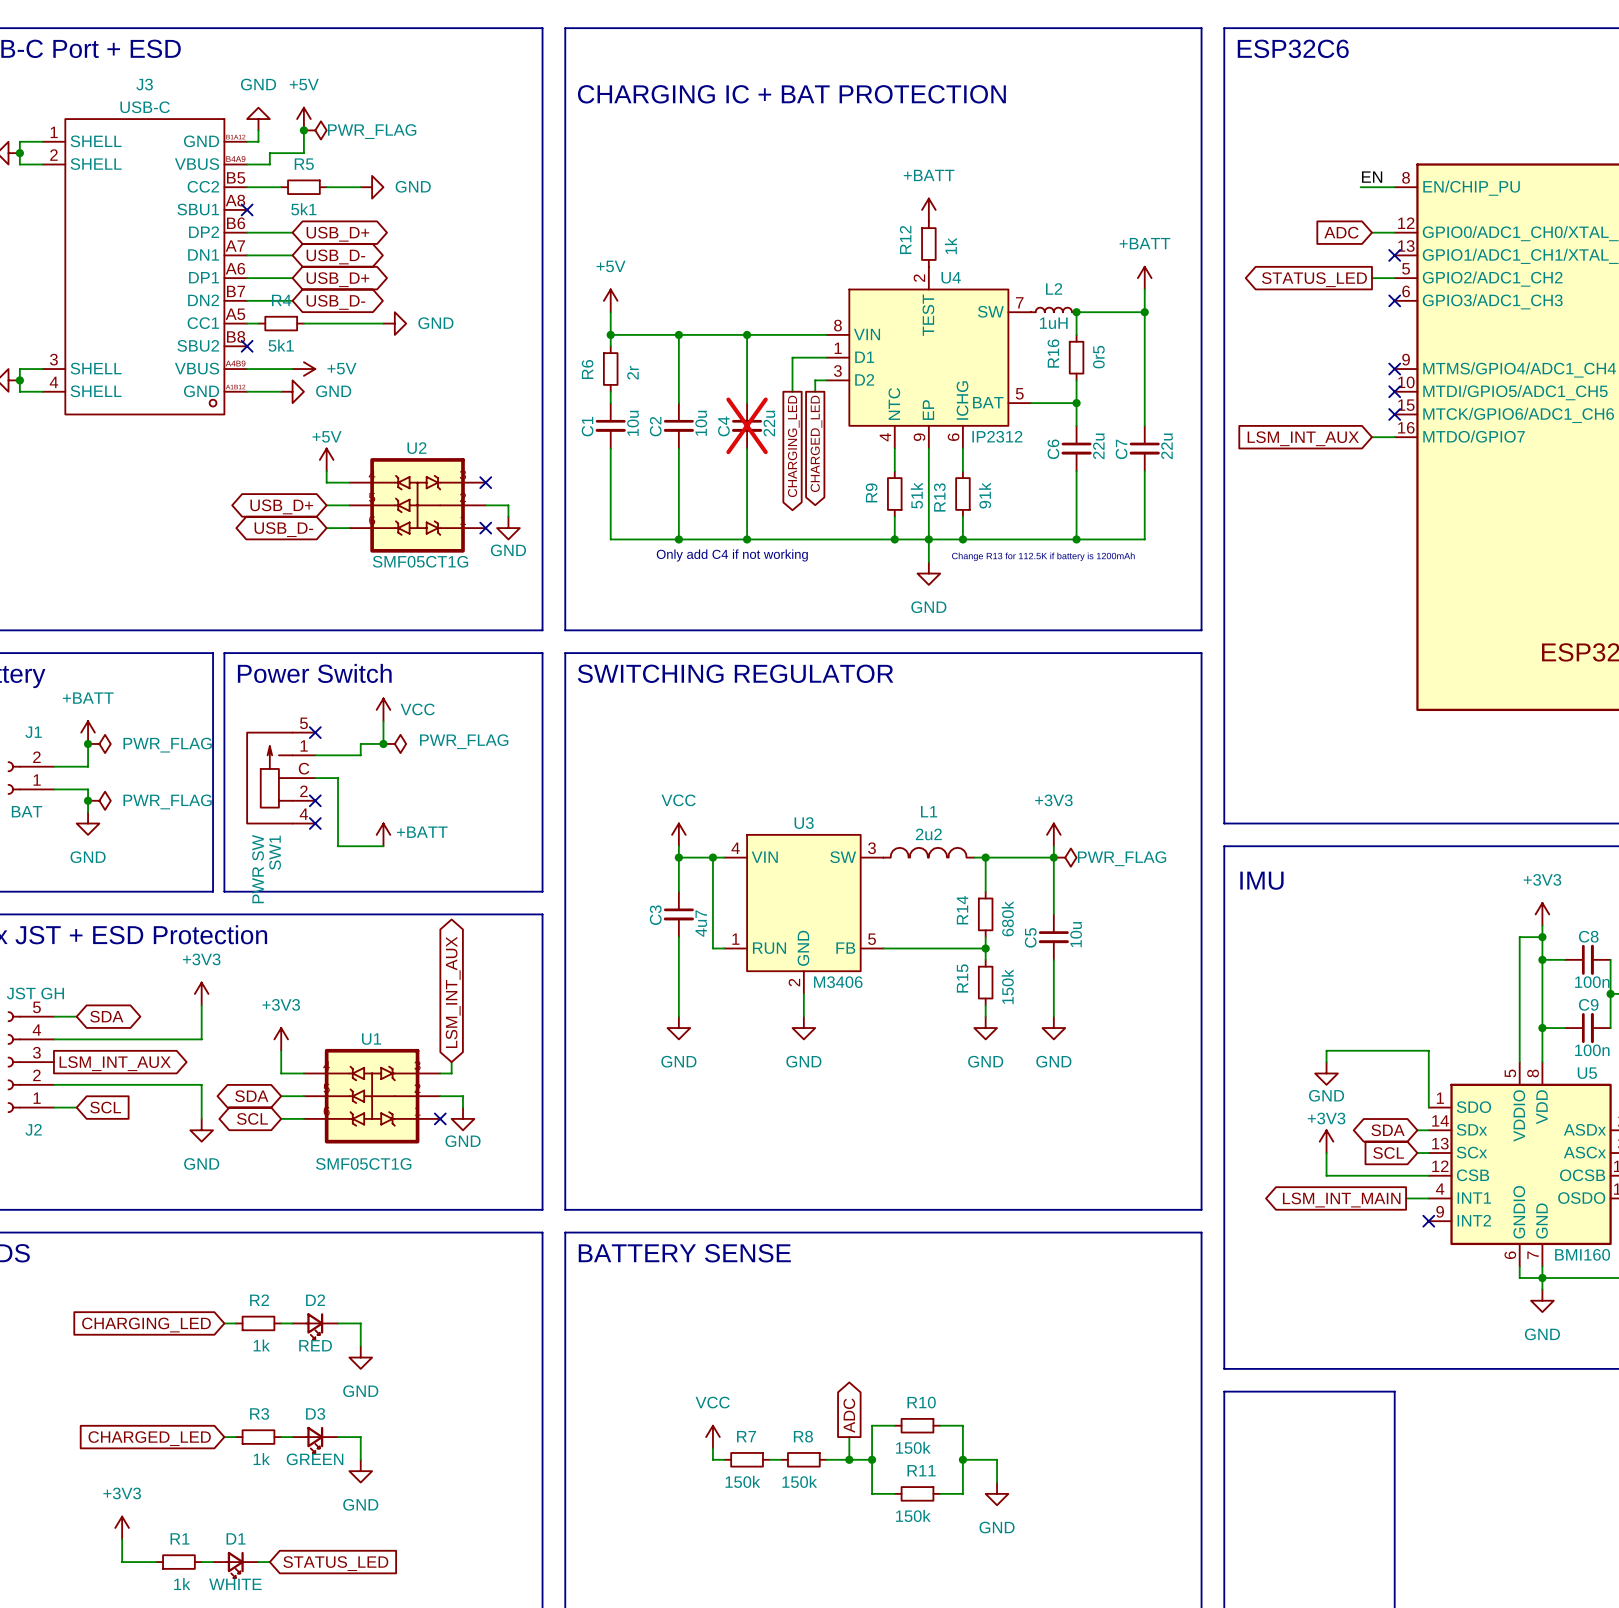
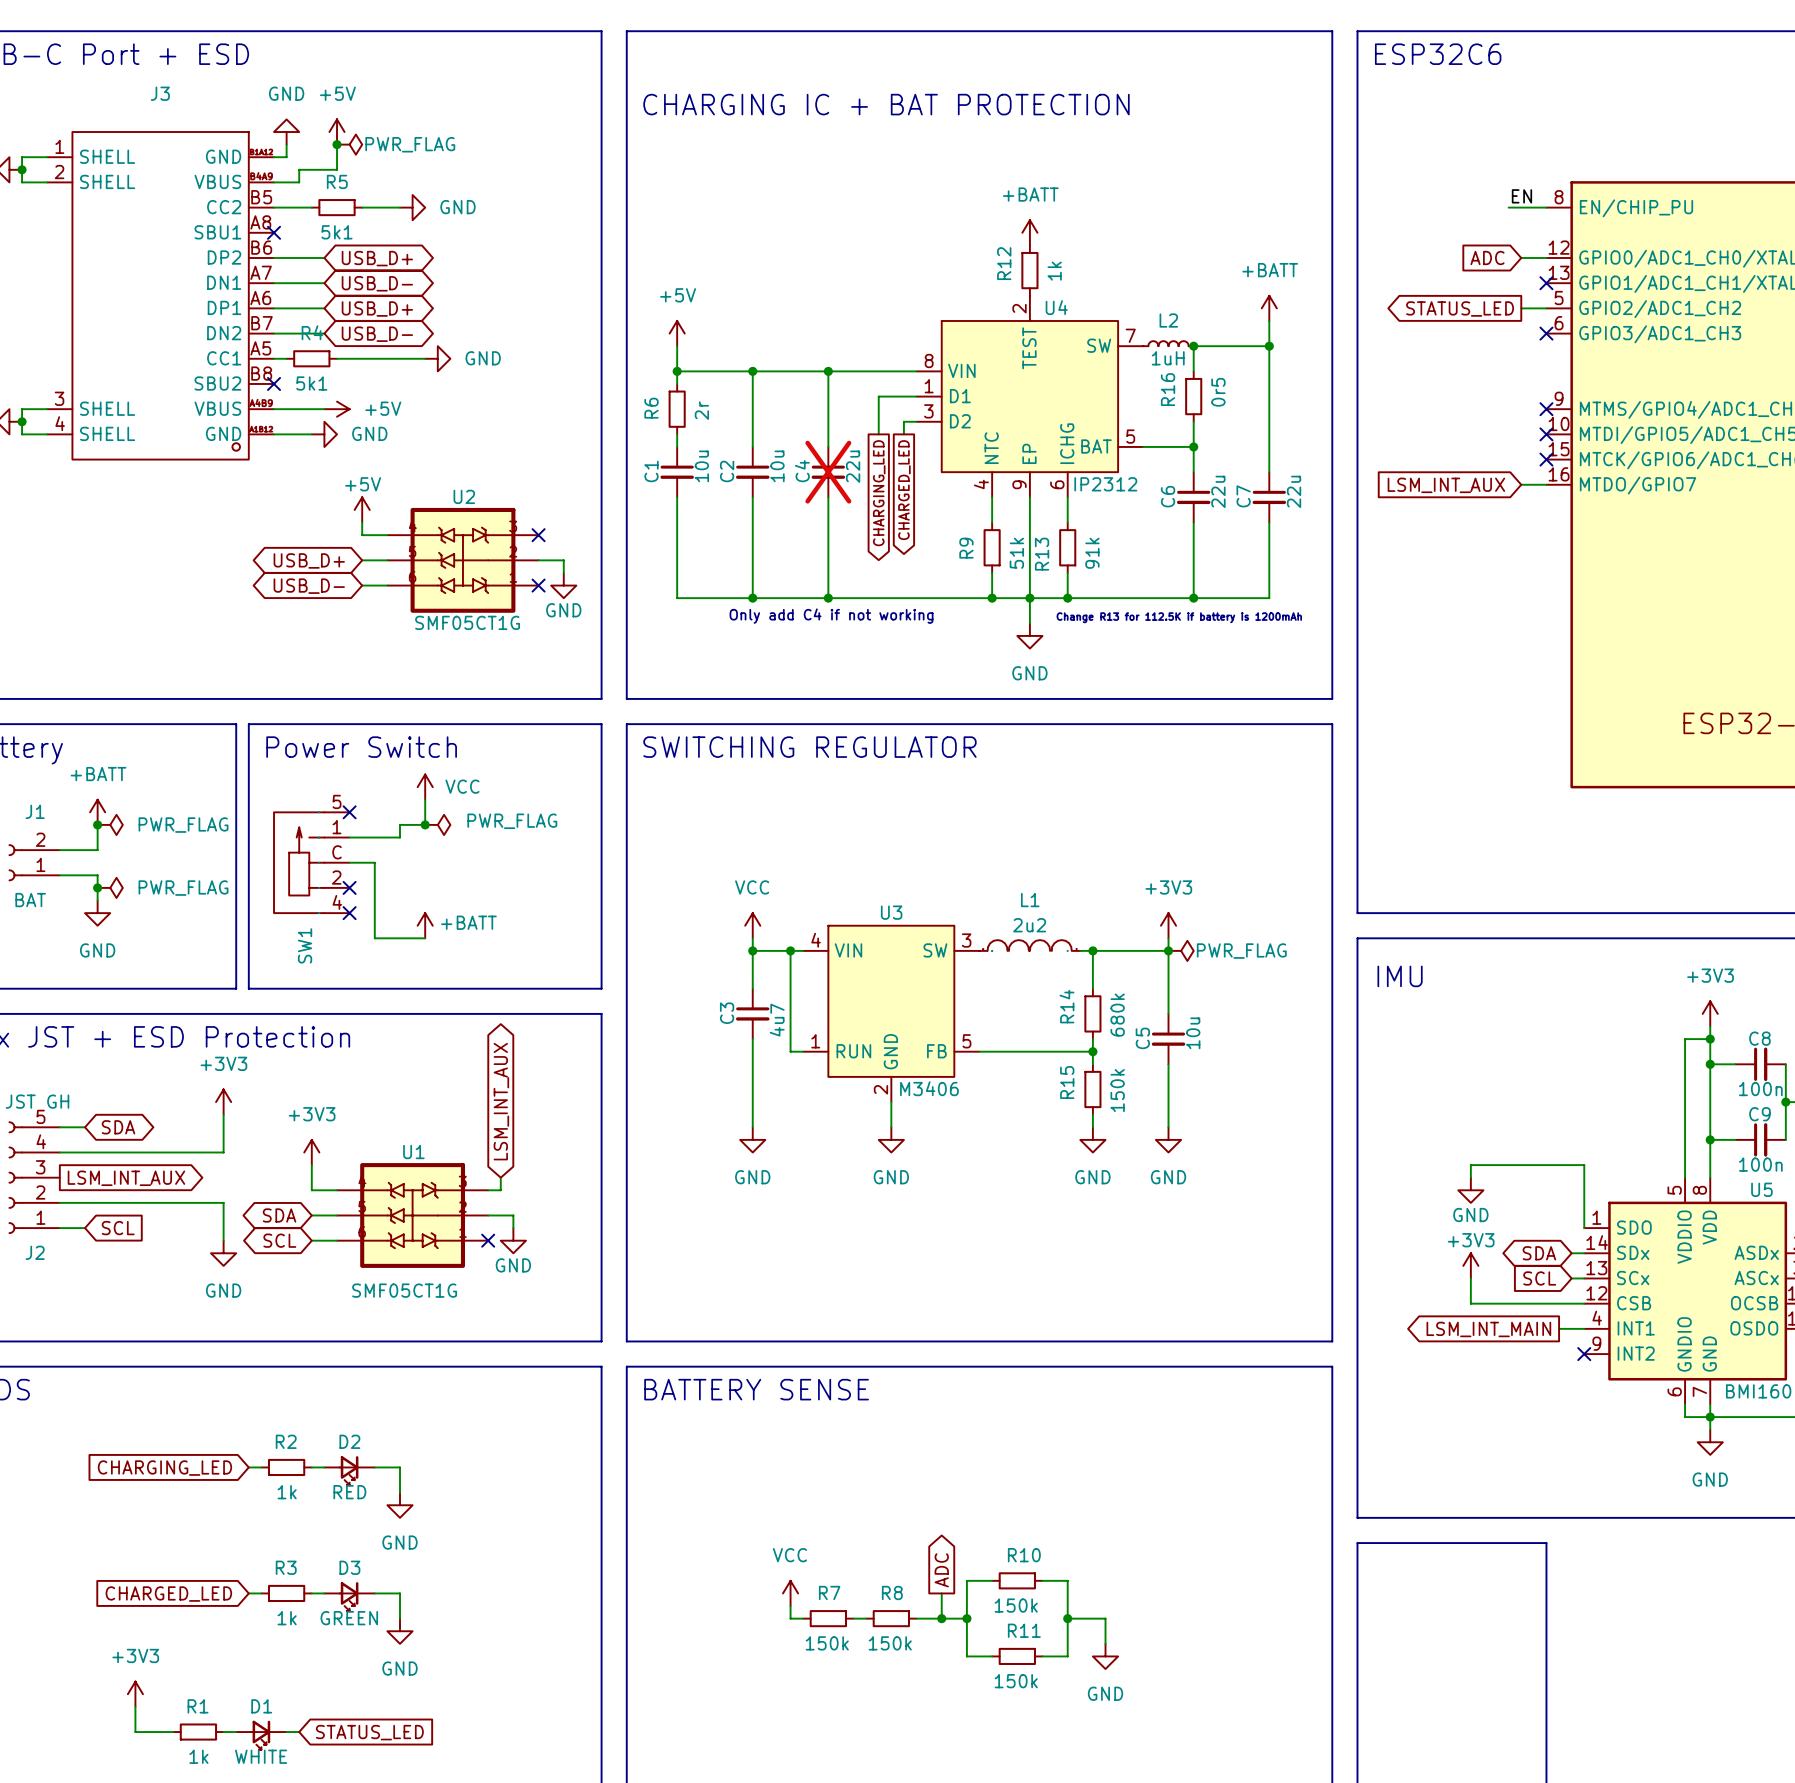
J3 value: USB-C (145, 107) -> none
SW1 value: PWR SW (258, 869) -> none

